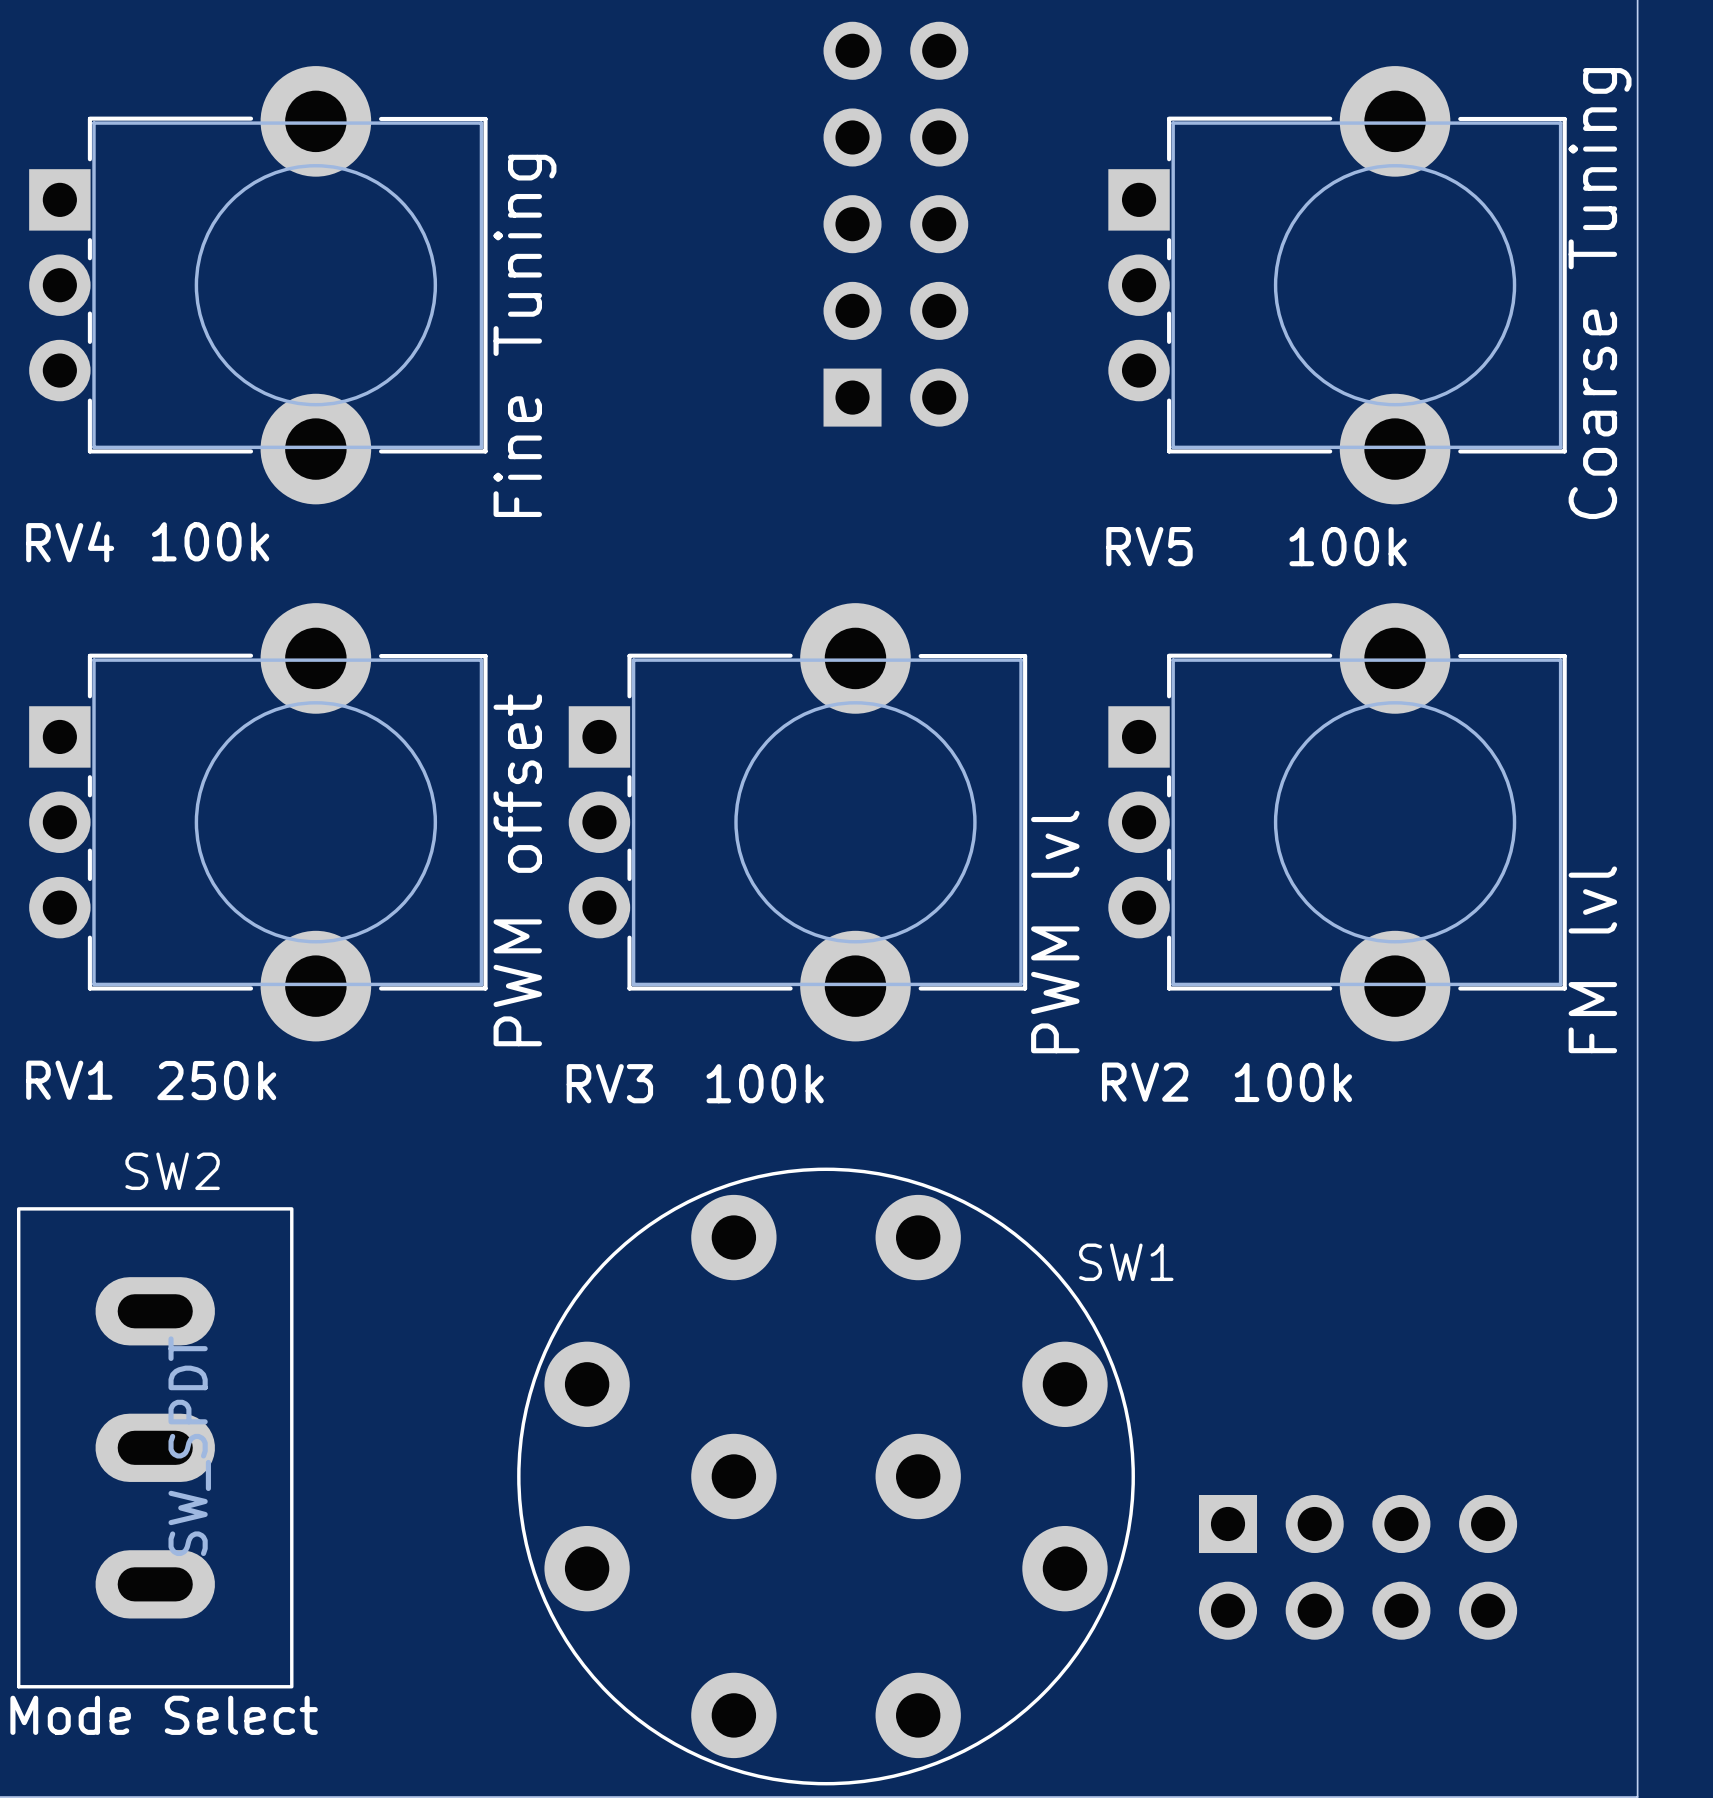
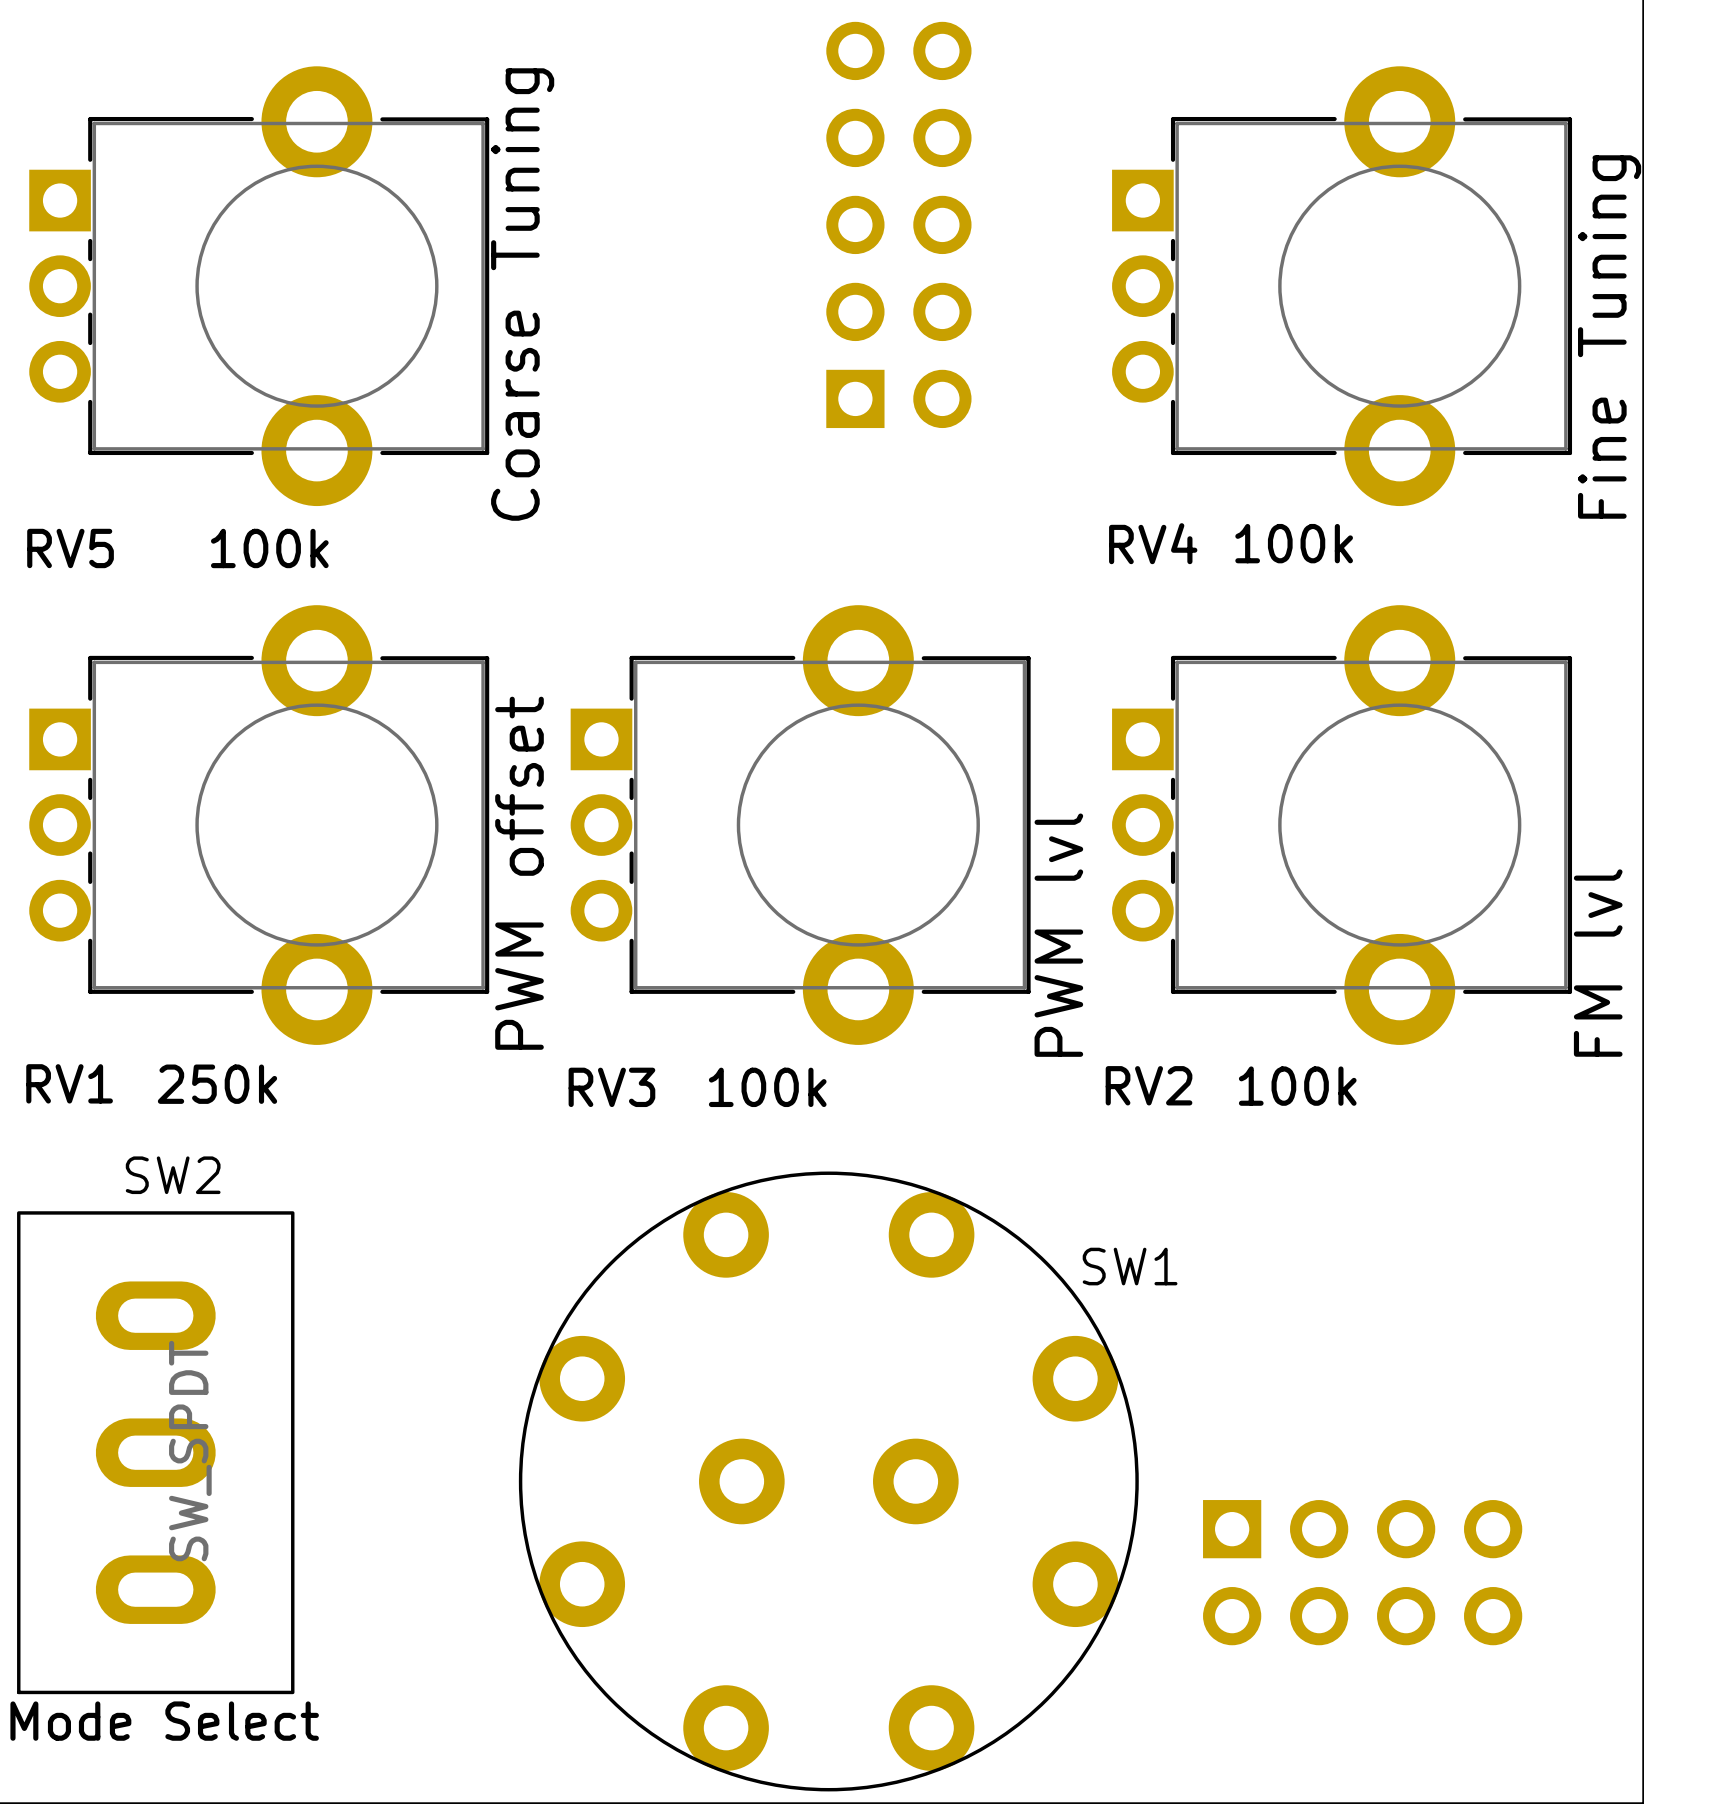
RV5 text: Coarse Tuning (1600, 293) -> Fine Tuning (1609, 337)
RV4 text: Fine Tuning (524, 335) -> Coarse Tuning (522, 294)
RV4 name: RV4 (70, 541) -> RV5 (70, 548)
RV4 value position: 100k (210, 541) -> 100k (269, 548)
RV5 name: RV5 (1149, 546) -> RV4 (1153, 543)
RV5 value position: 100k (1348, 546) -> 100k (1294, 543)
SW1 footprint: [517, 1167, 1135, 1786] -> [518, 1171, 1139, 1792]

